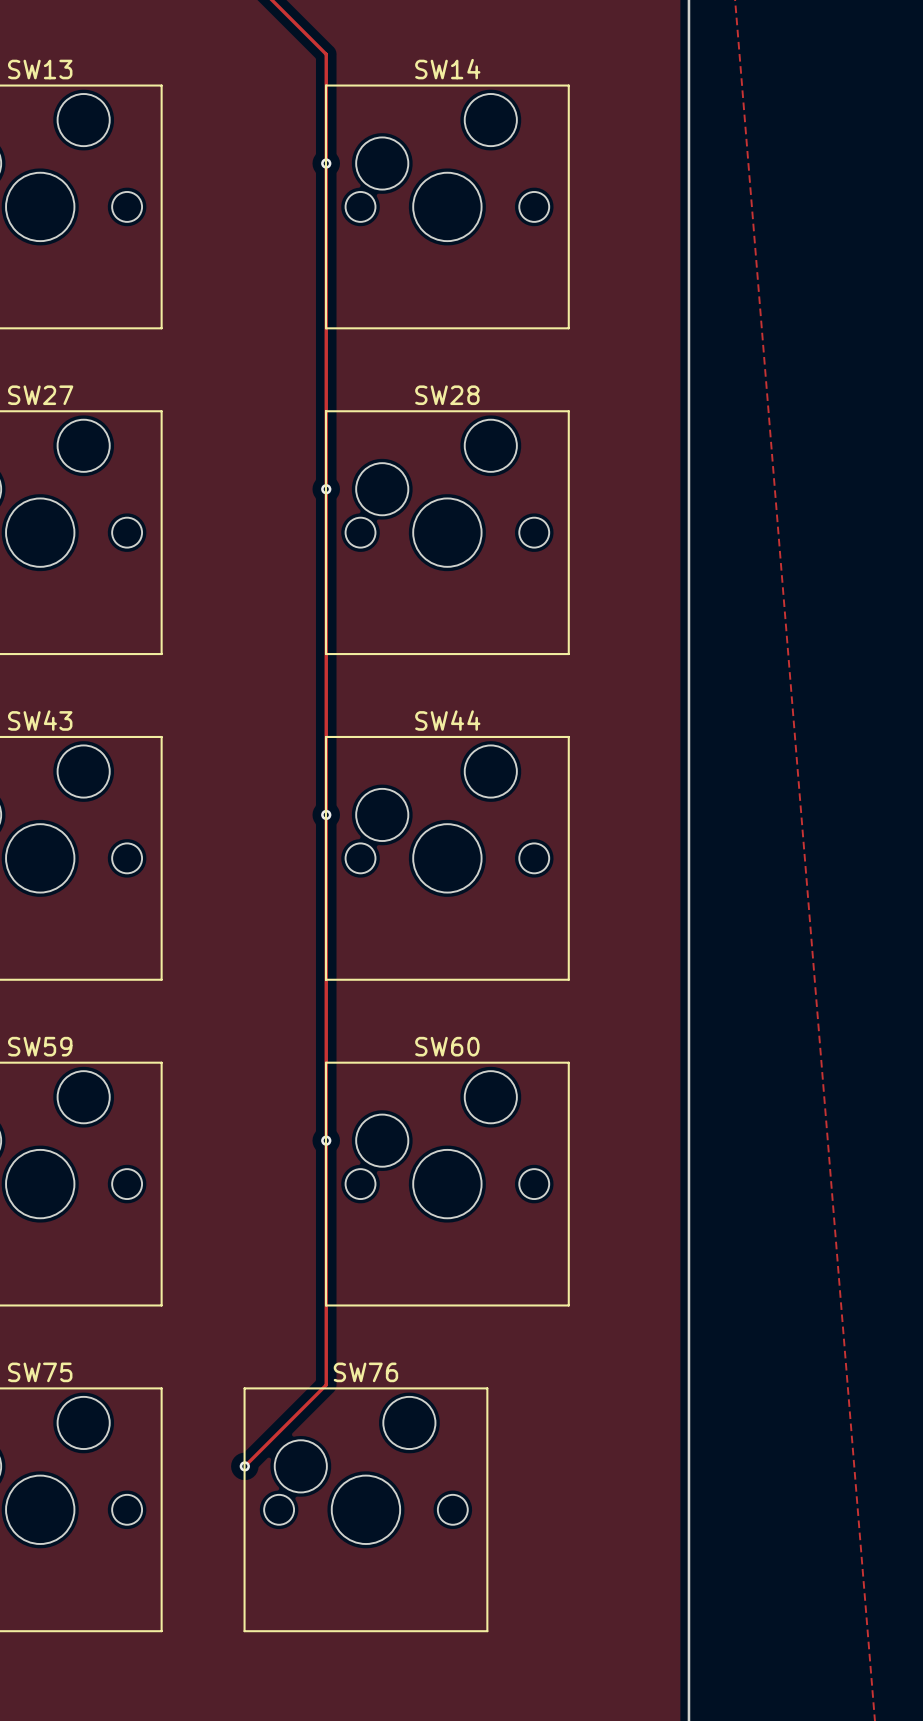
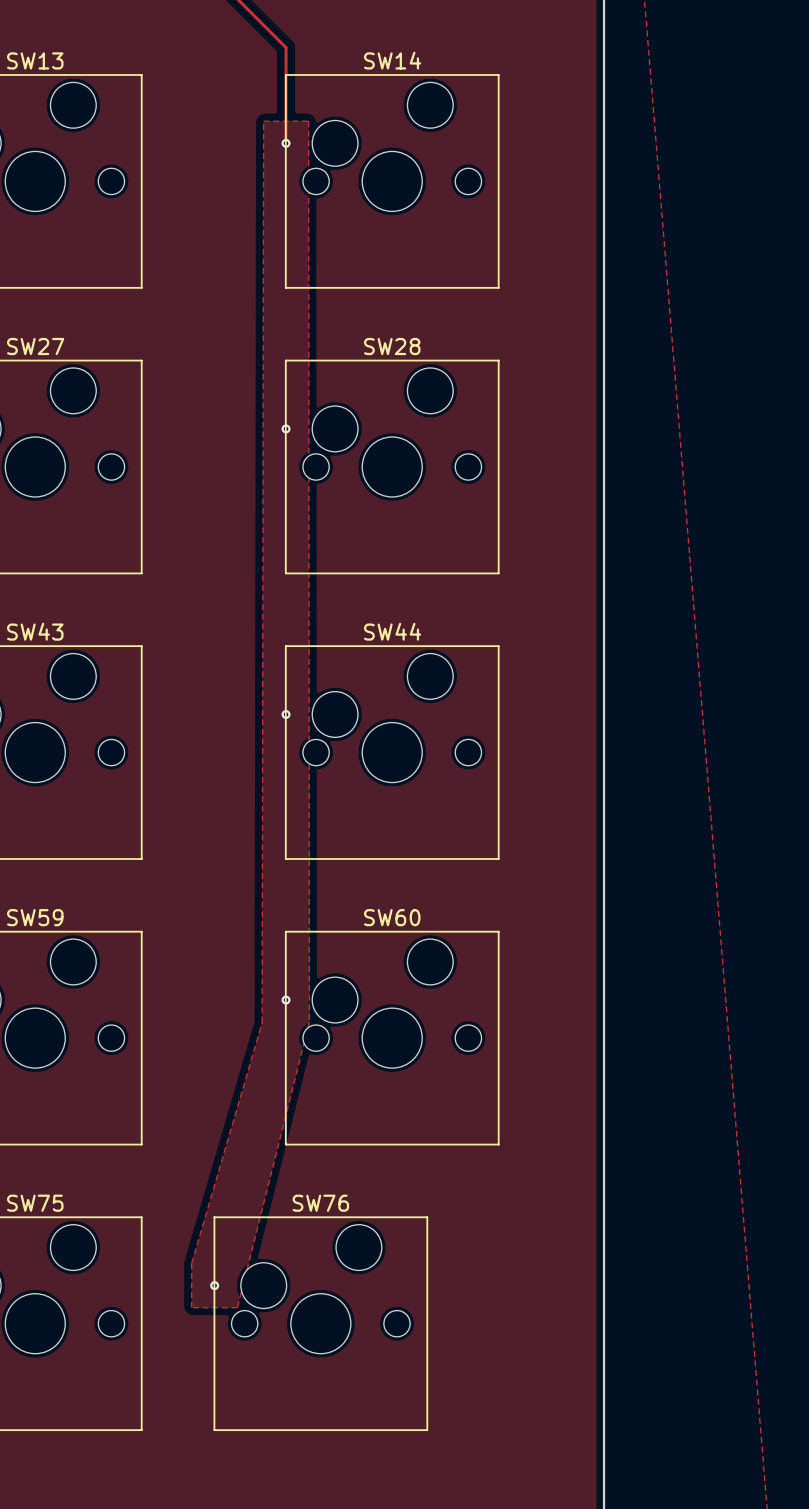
zone outline: none -> (263, 121) (308, 121) (309, 1022) (237, 1307) (191, 1307) (191, 1263) (262, 1022) (263, 121)
track: (326, 163) (326, 1384) (244, 1466) -> none

